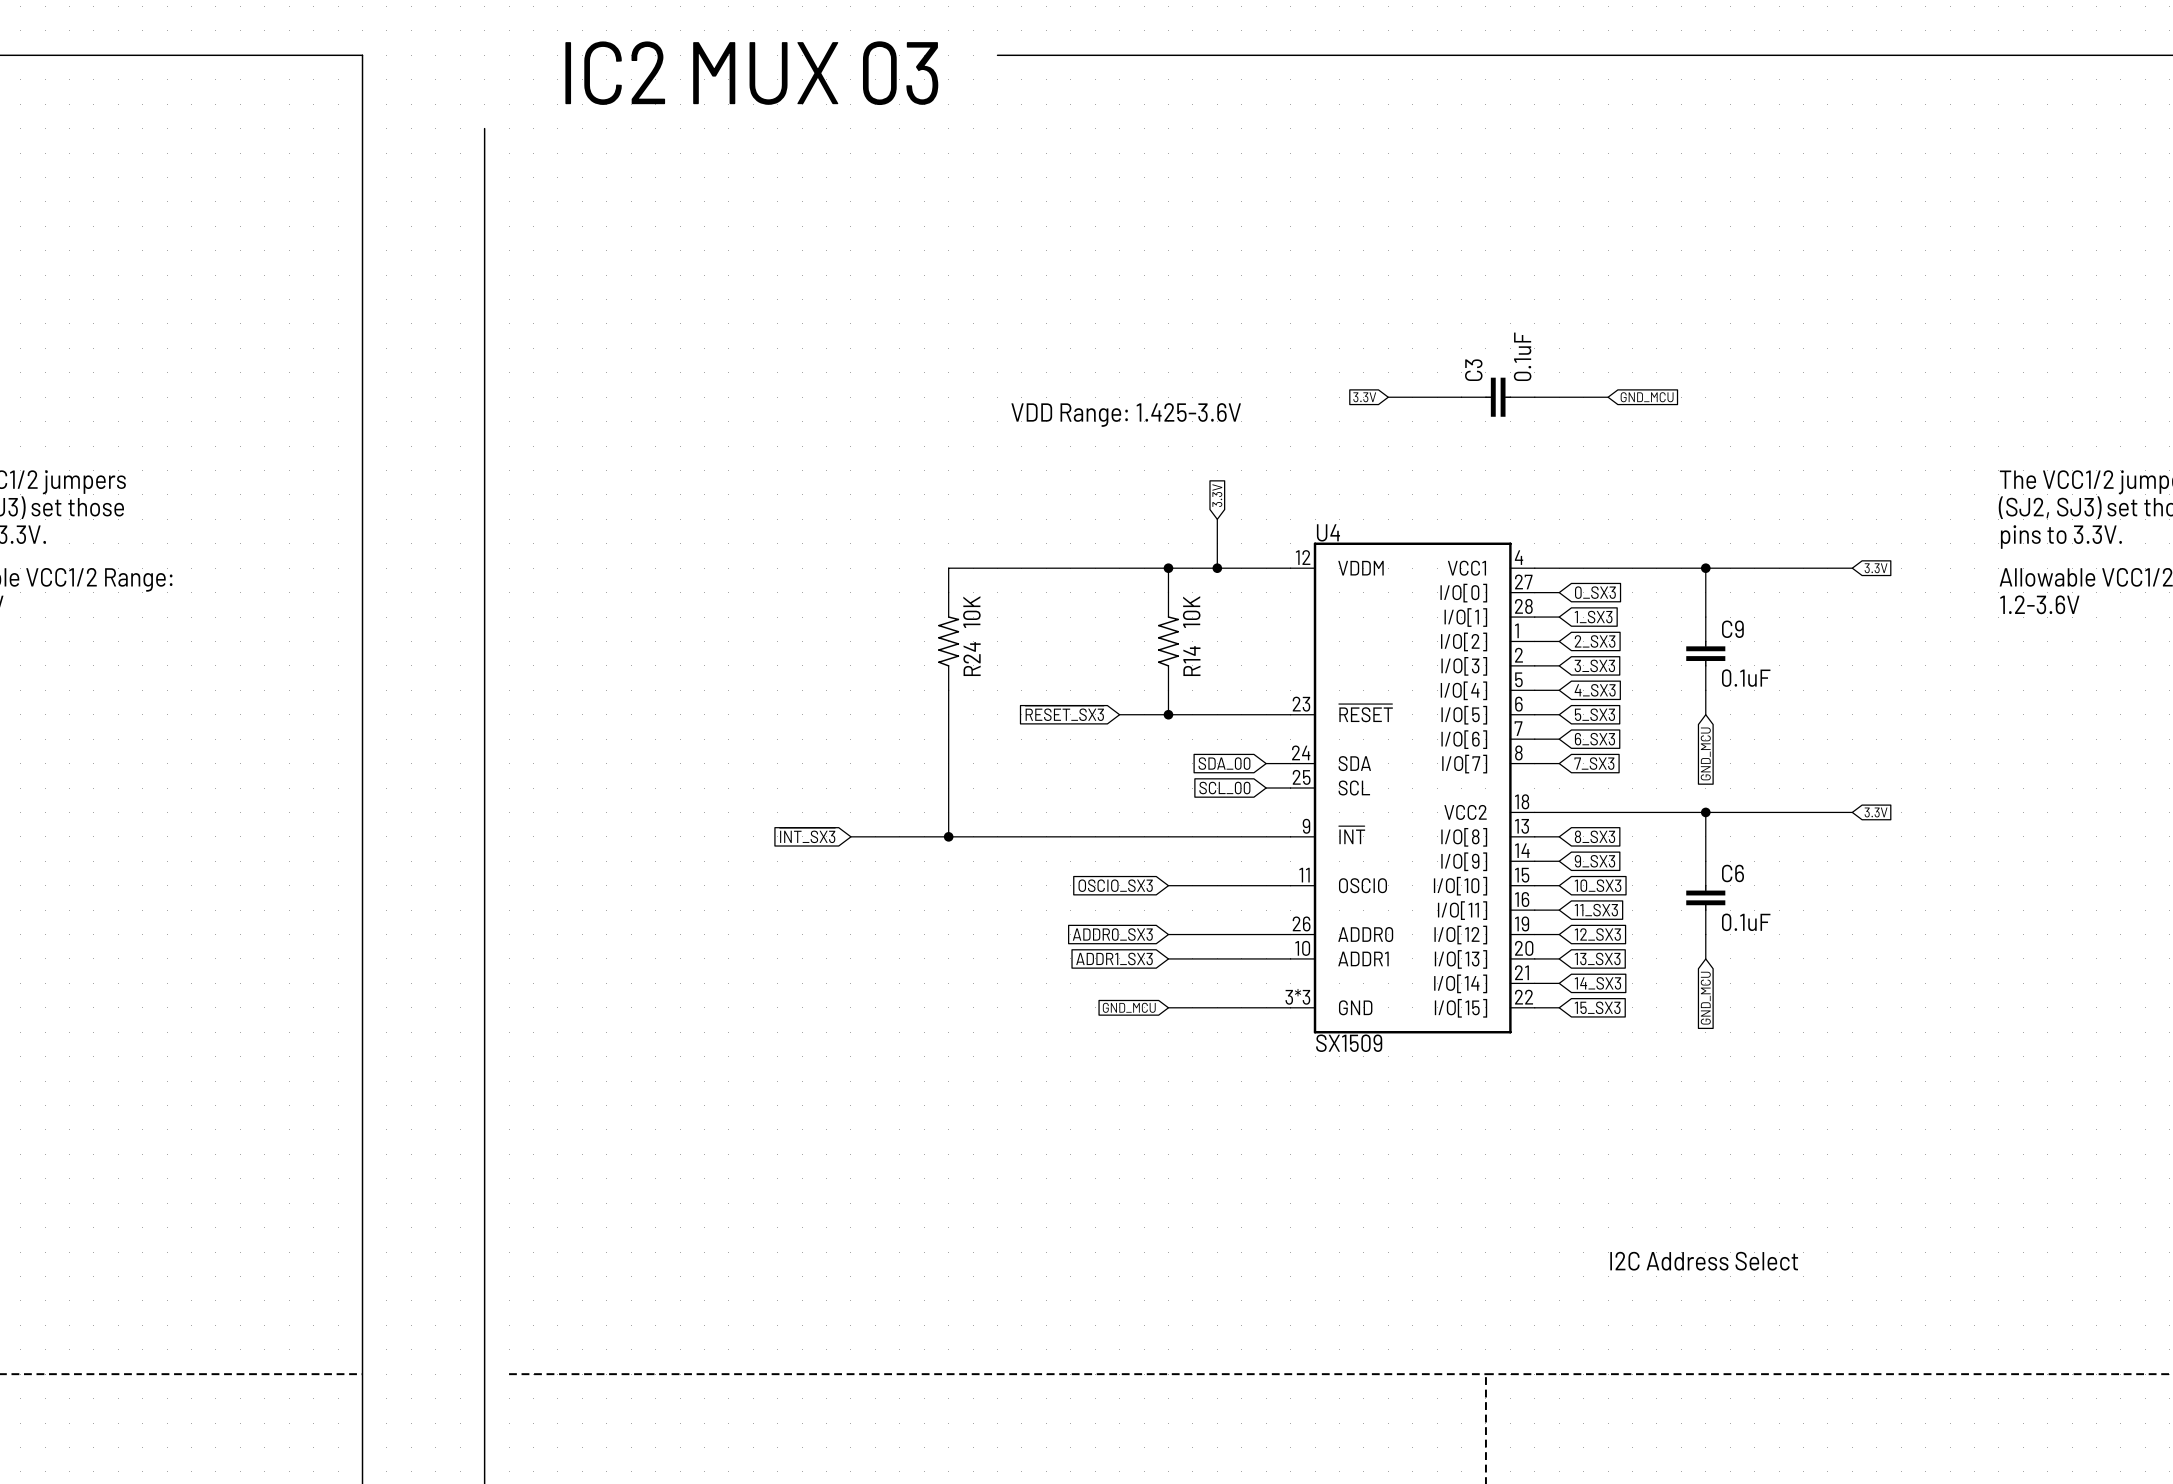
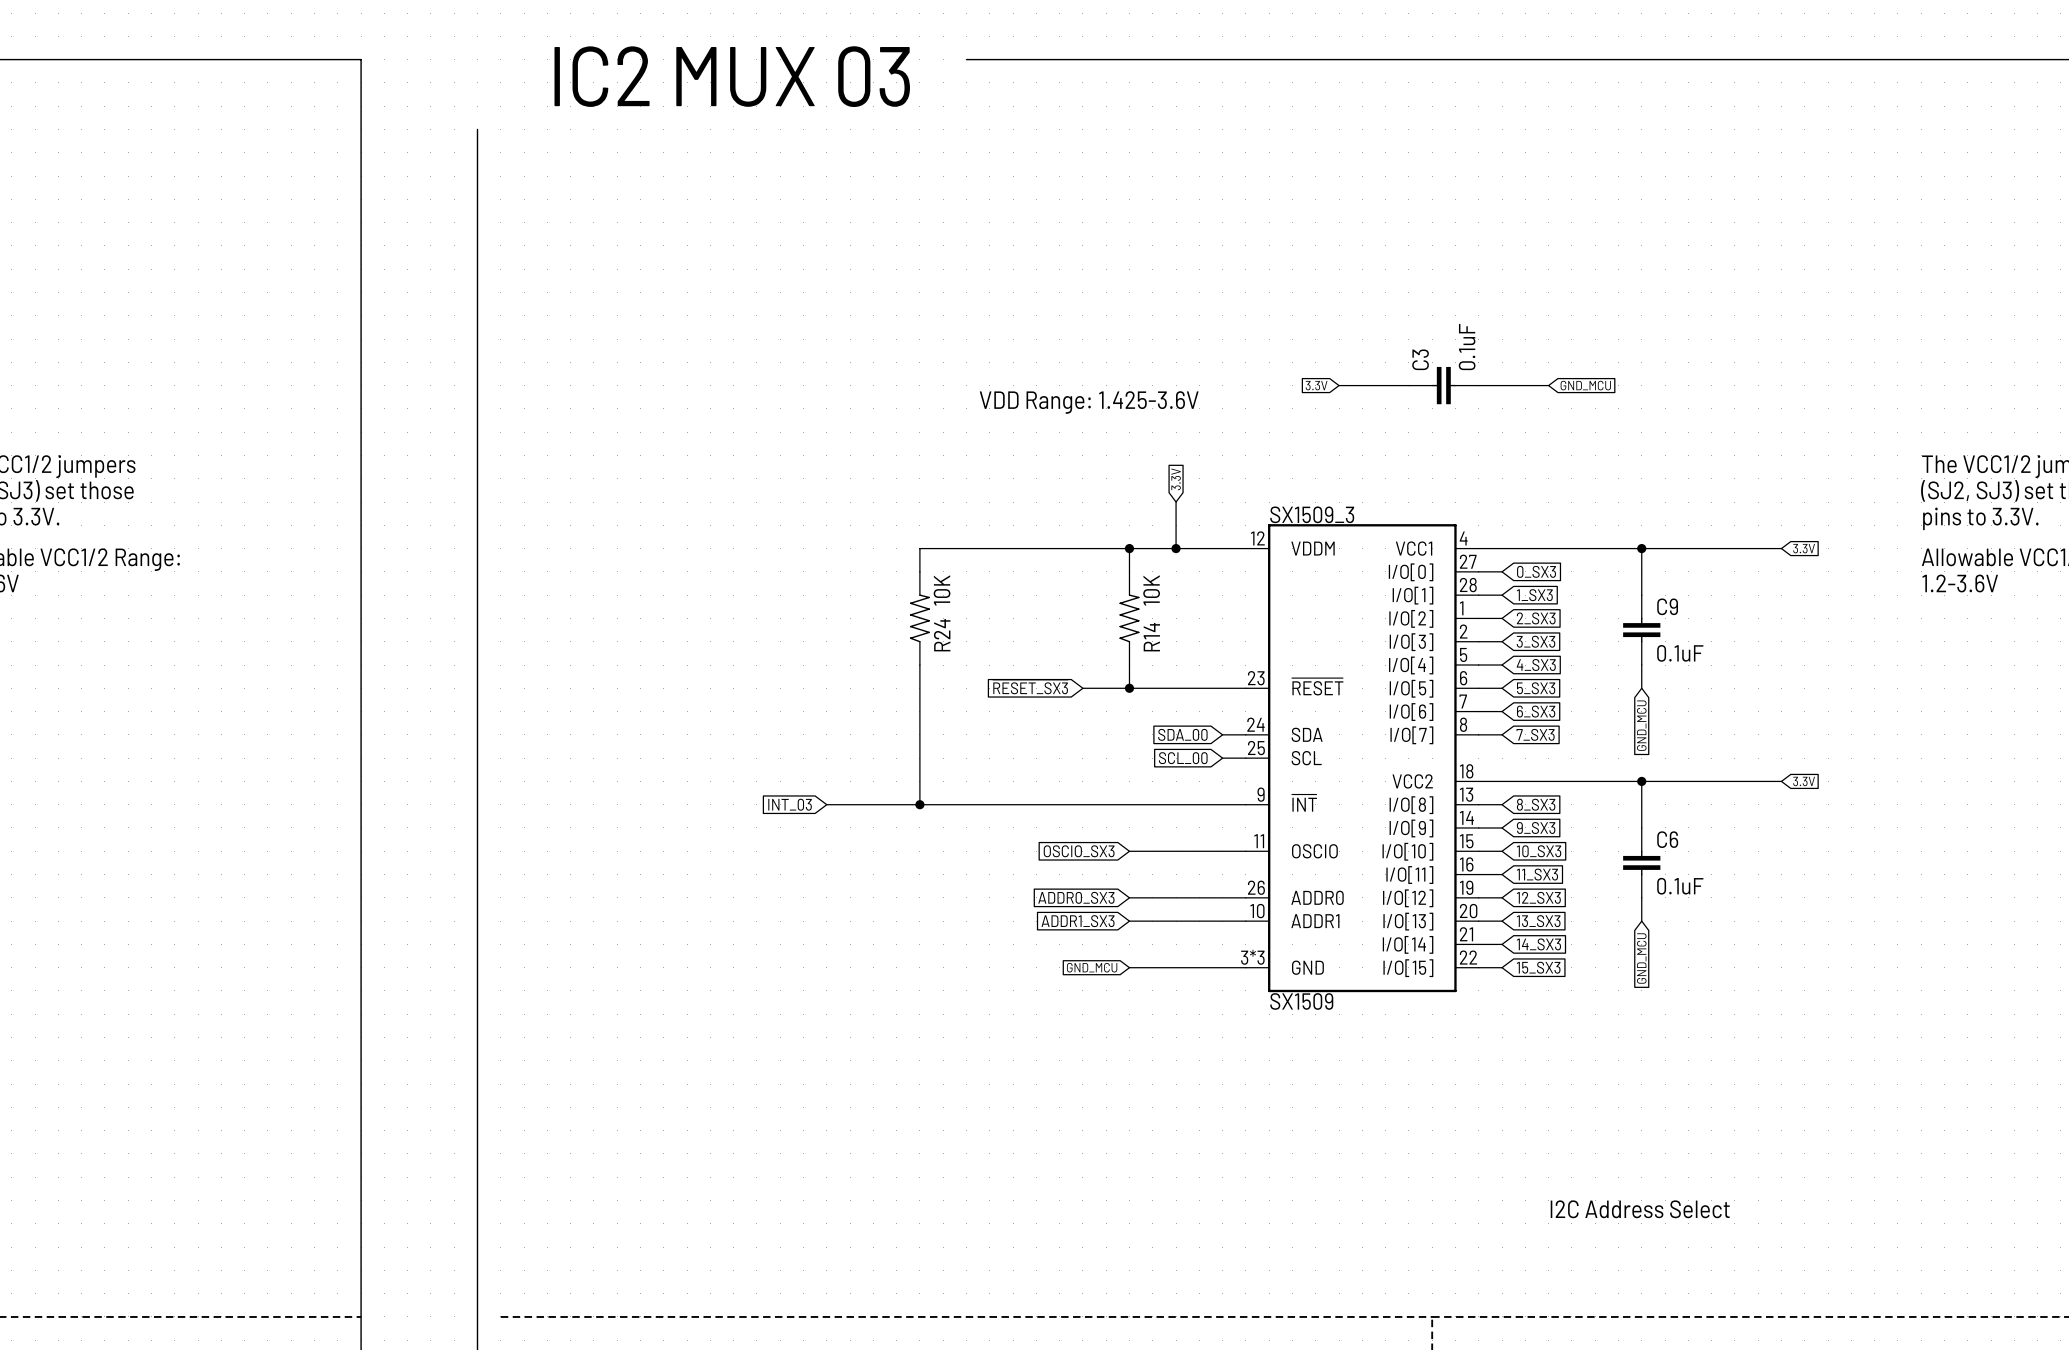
U4 name: U4 (1328, 532) -> SX1509_3 (1312, 514)
global label: ~{INT_SX3} (807, 835) -> INT_03 (790, 804)

